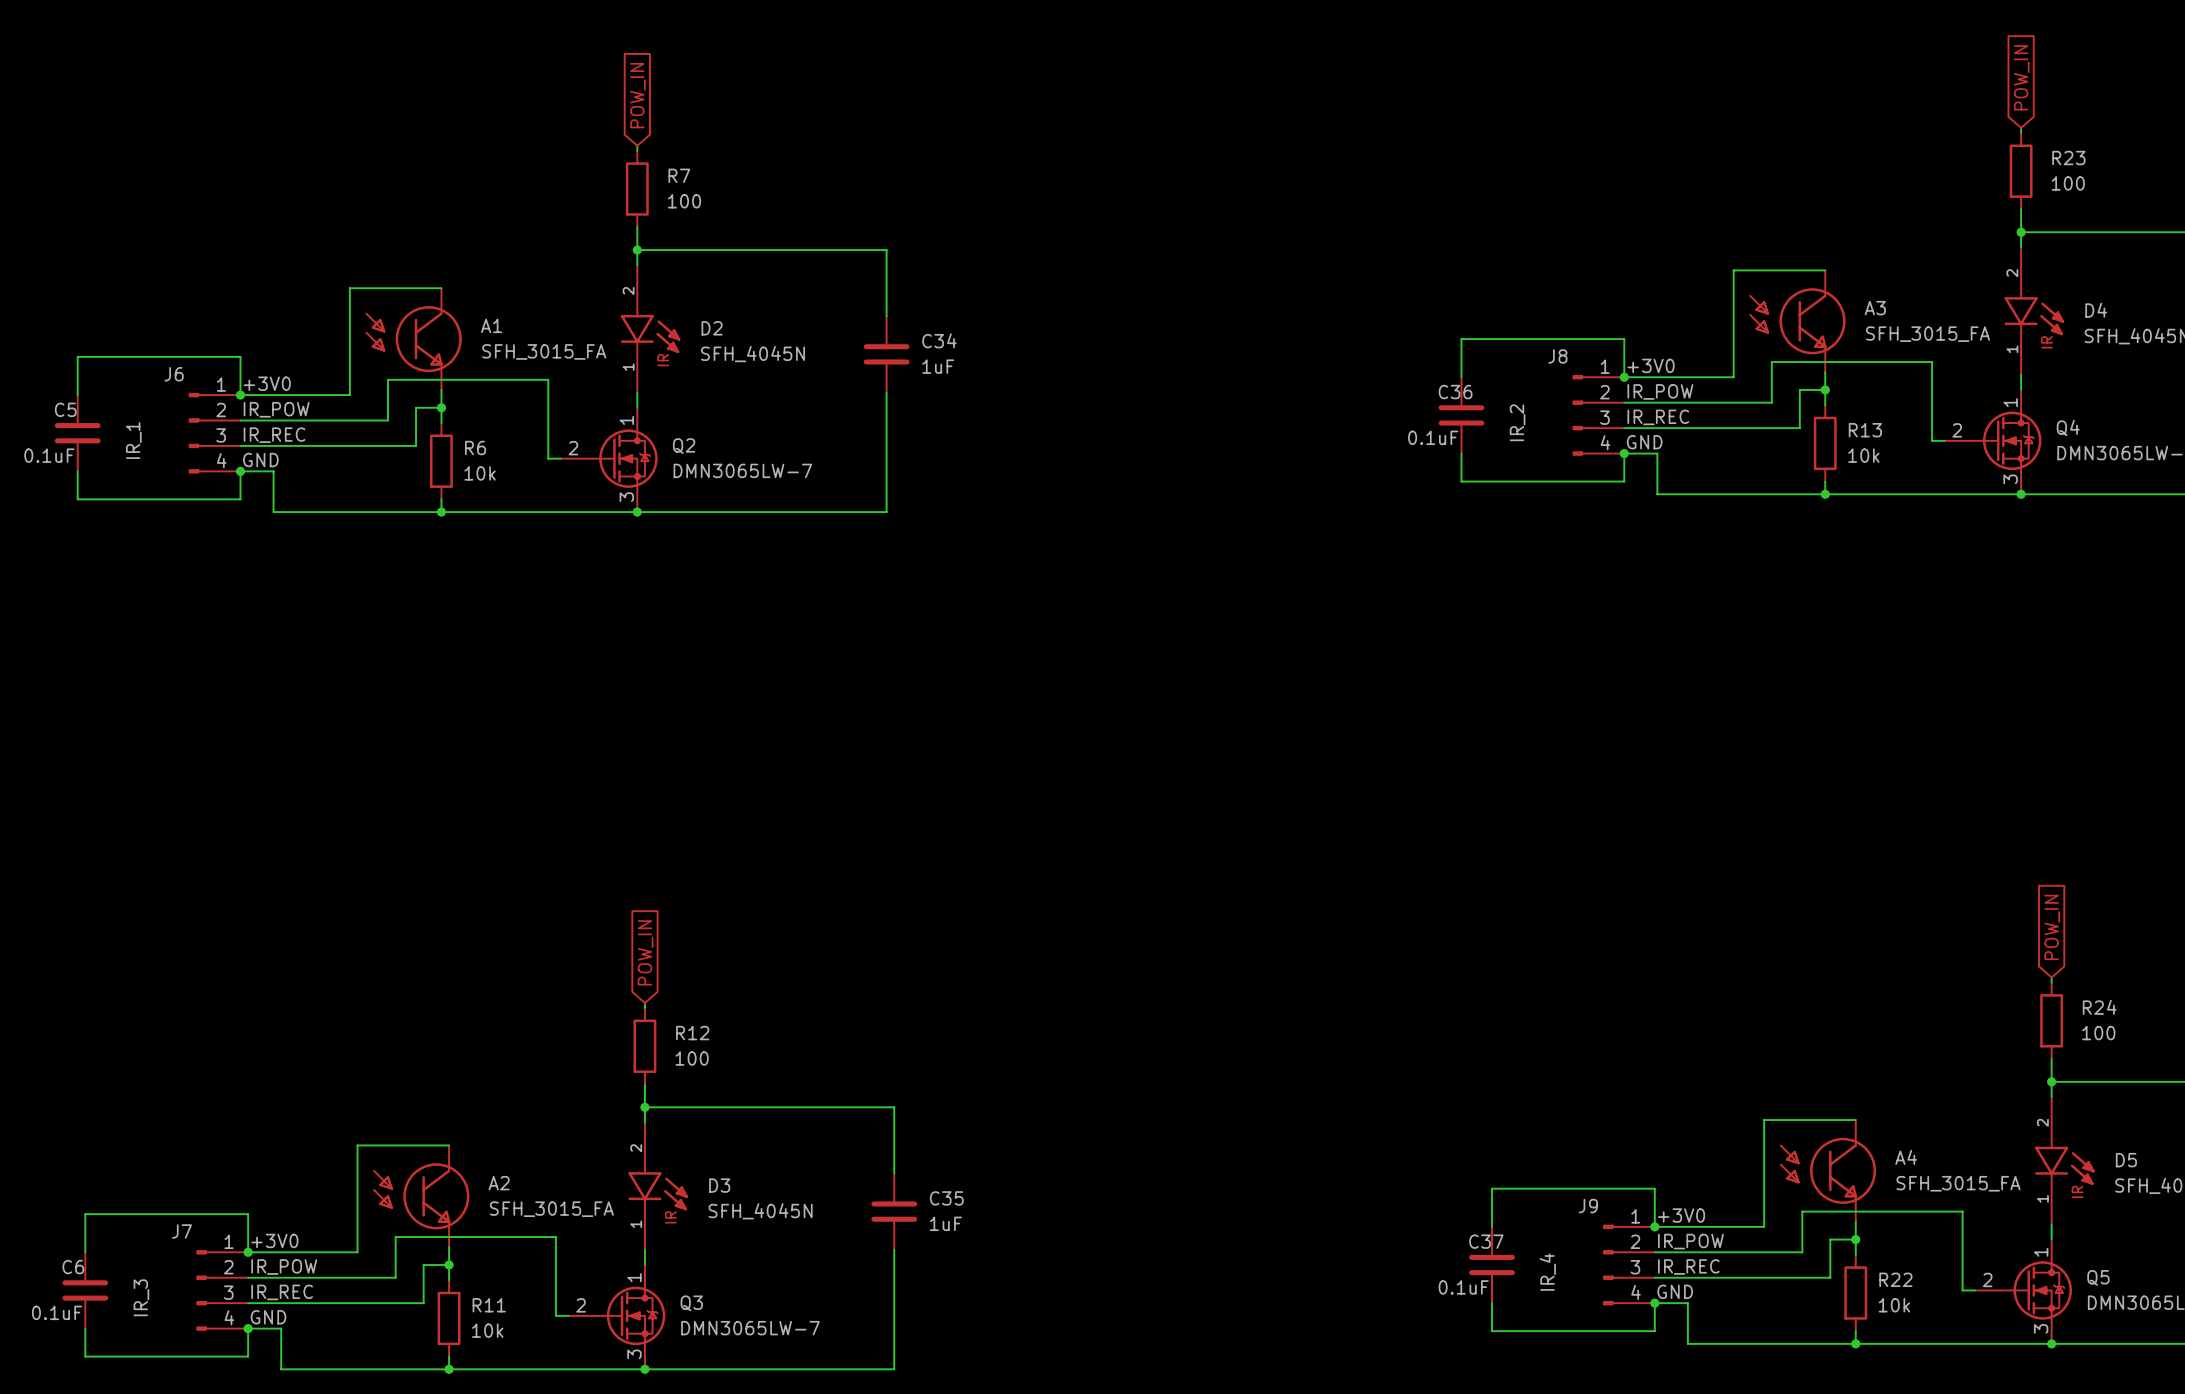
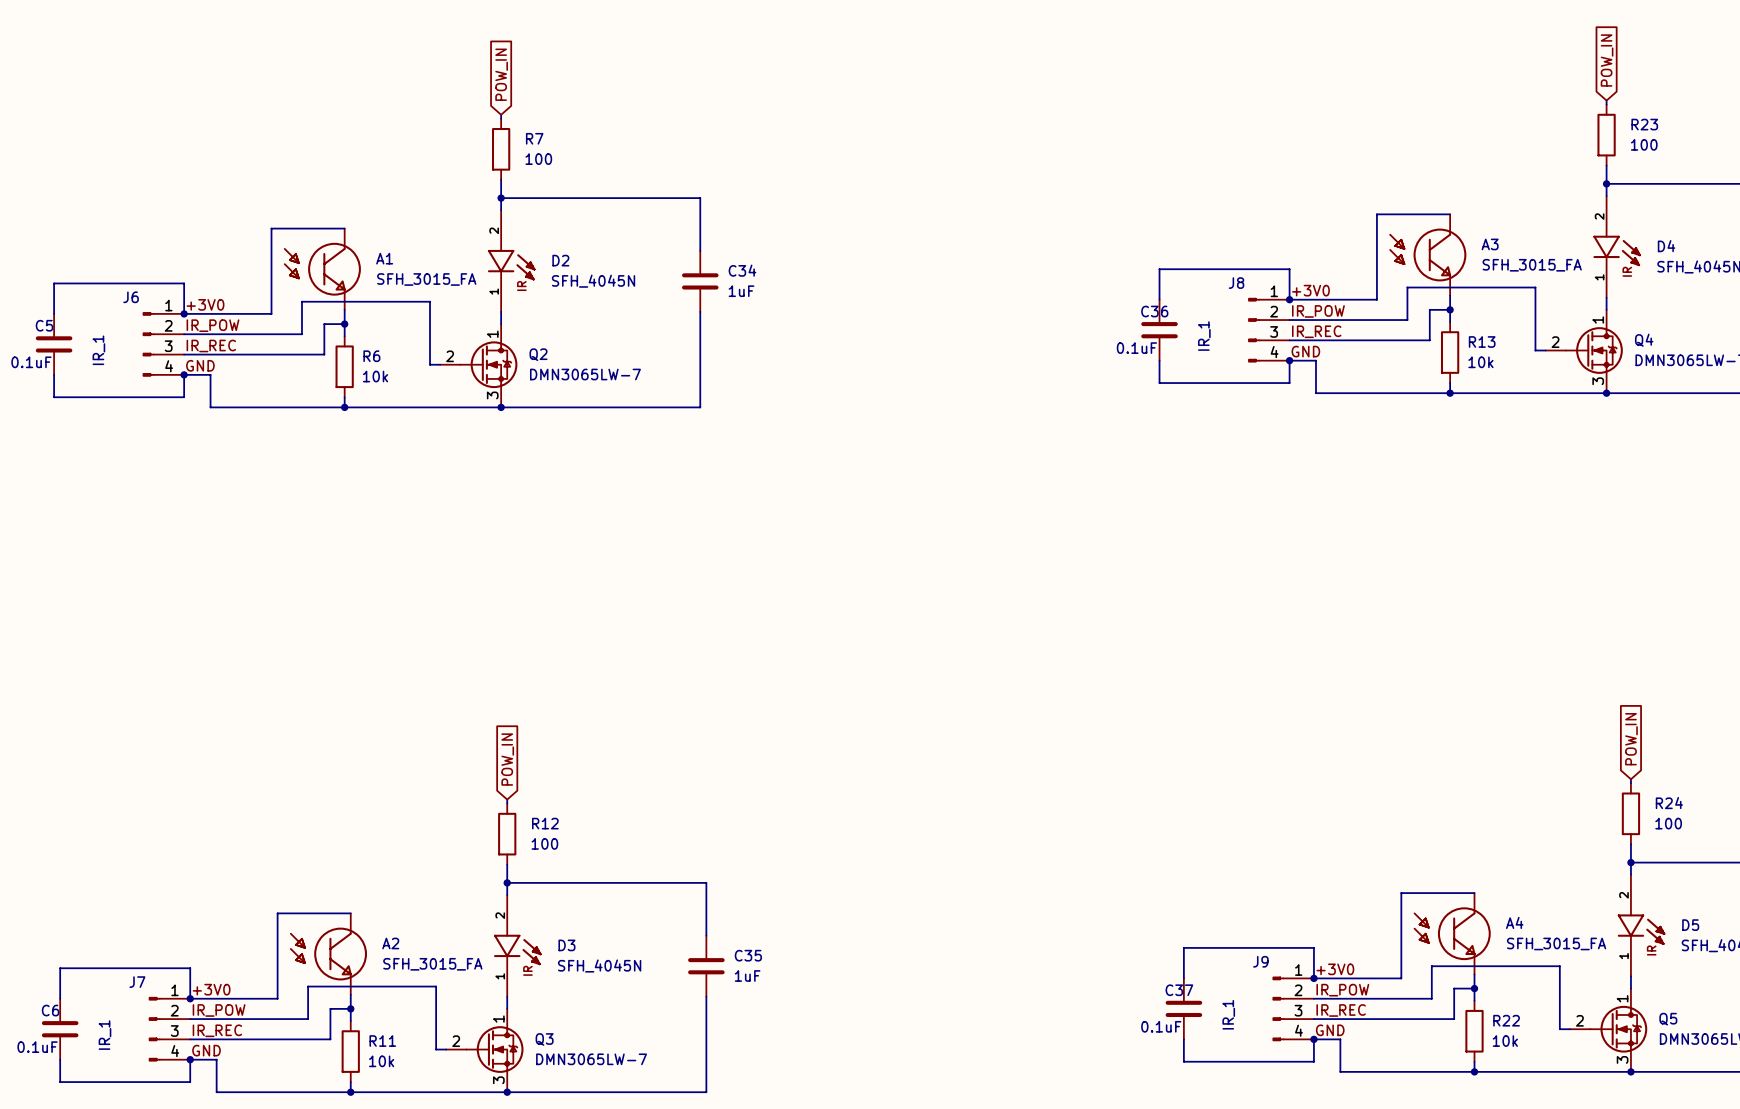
J8 value: IR_2 (1517, 422) -> IR_1 (1204, 336)
J9 value: IR_4 (1547, 1272) -> IR_1 (1228, 1014)
J7 value: IR_3 (141, 1297) -> IR_1 (104, 1035)

